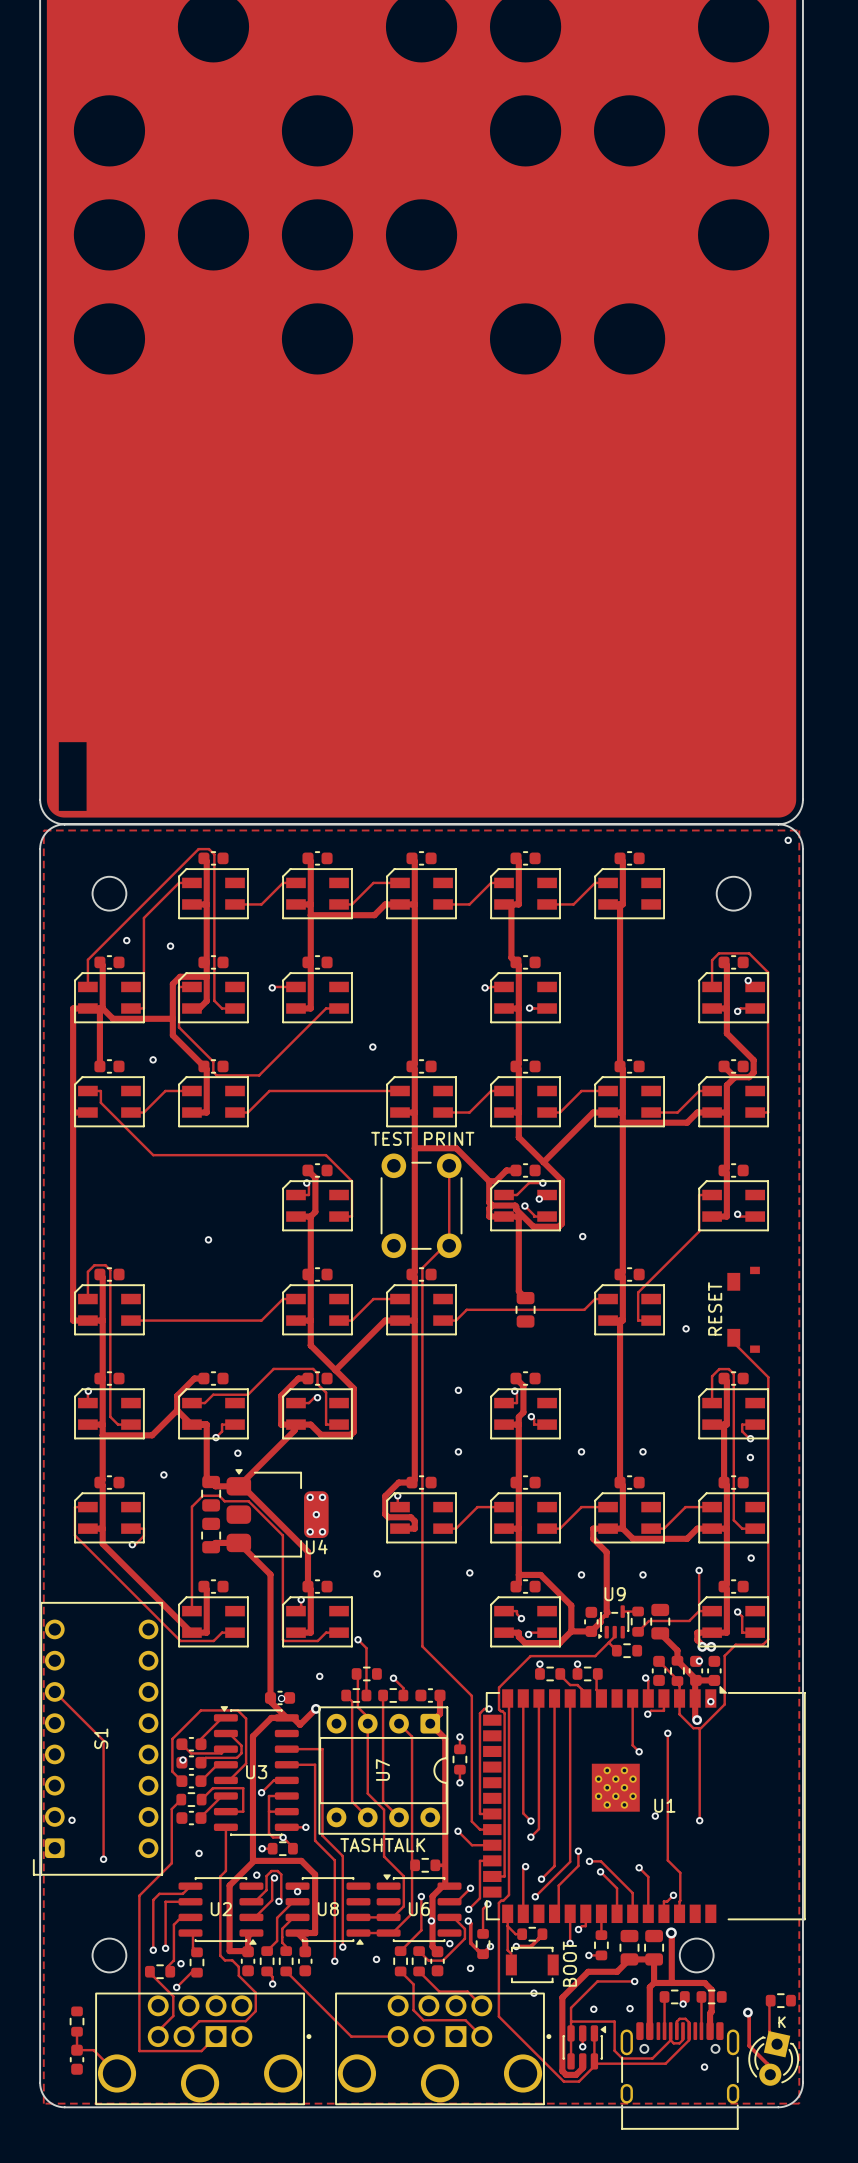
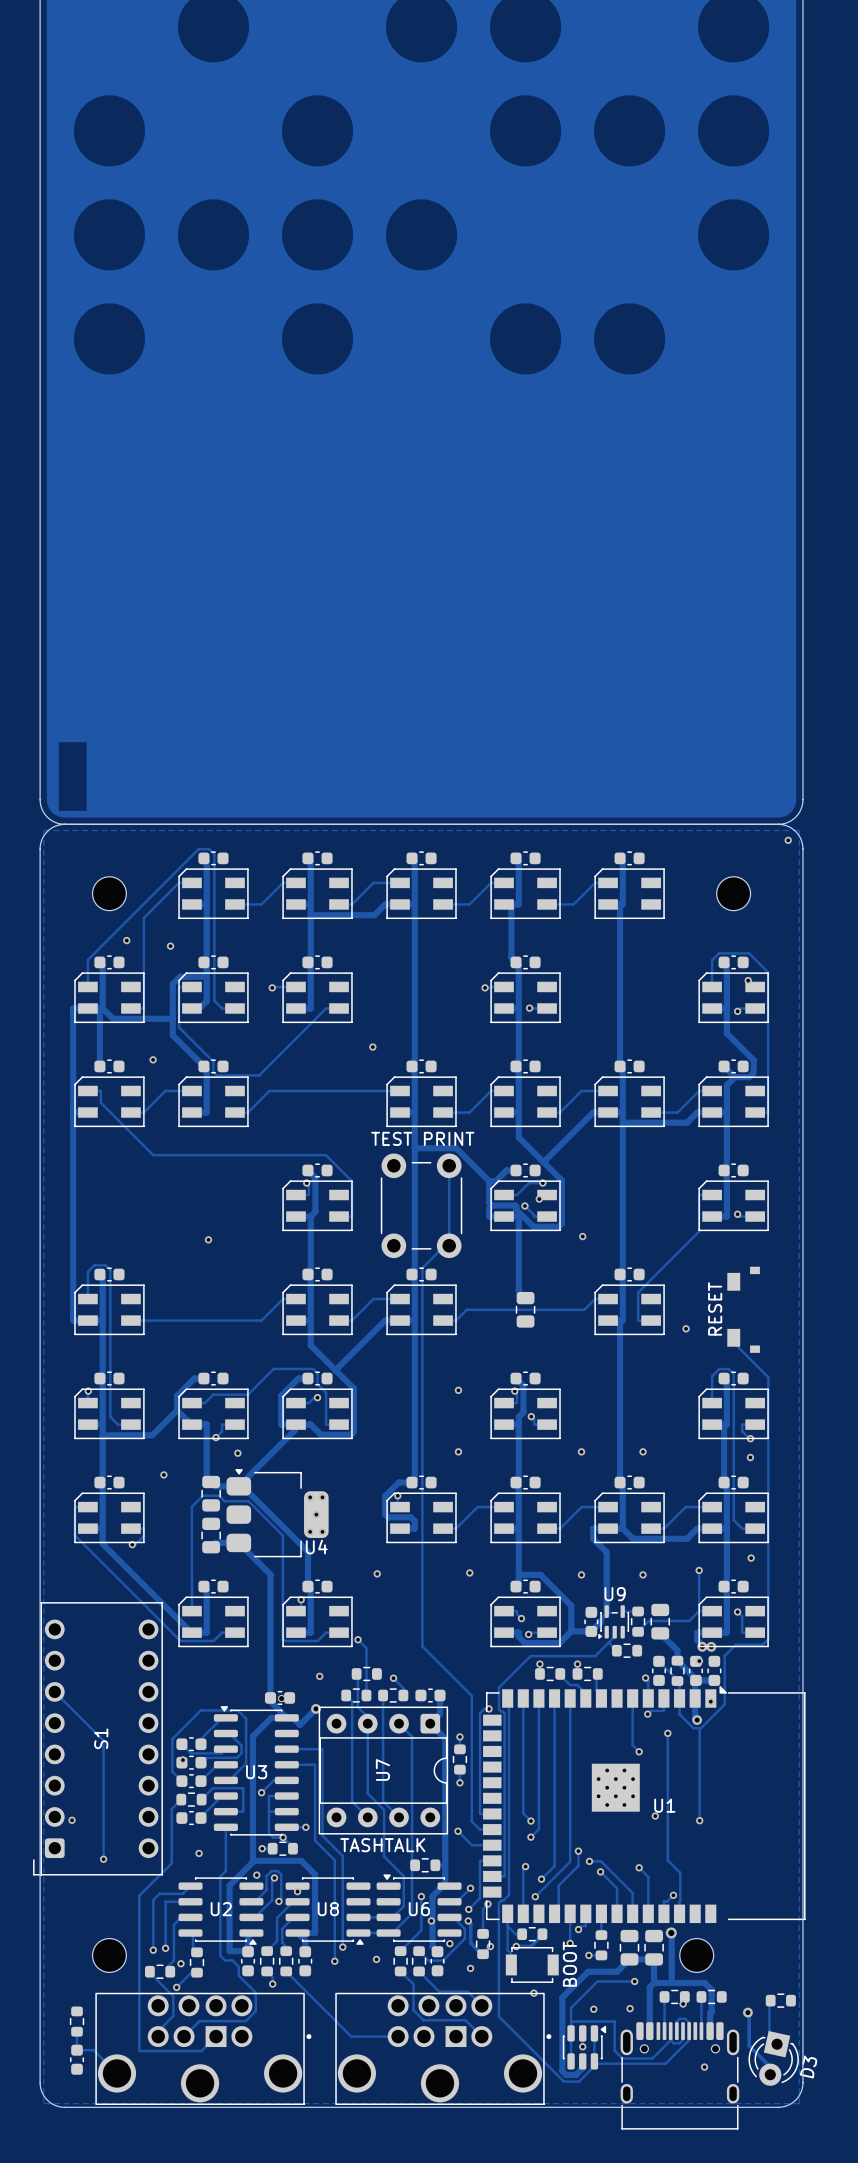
text: K (782, 2022) -> none
D3 name: none -> D3 (808, 2066)

